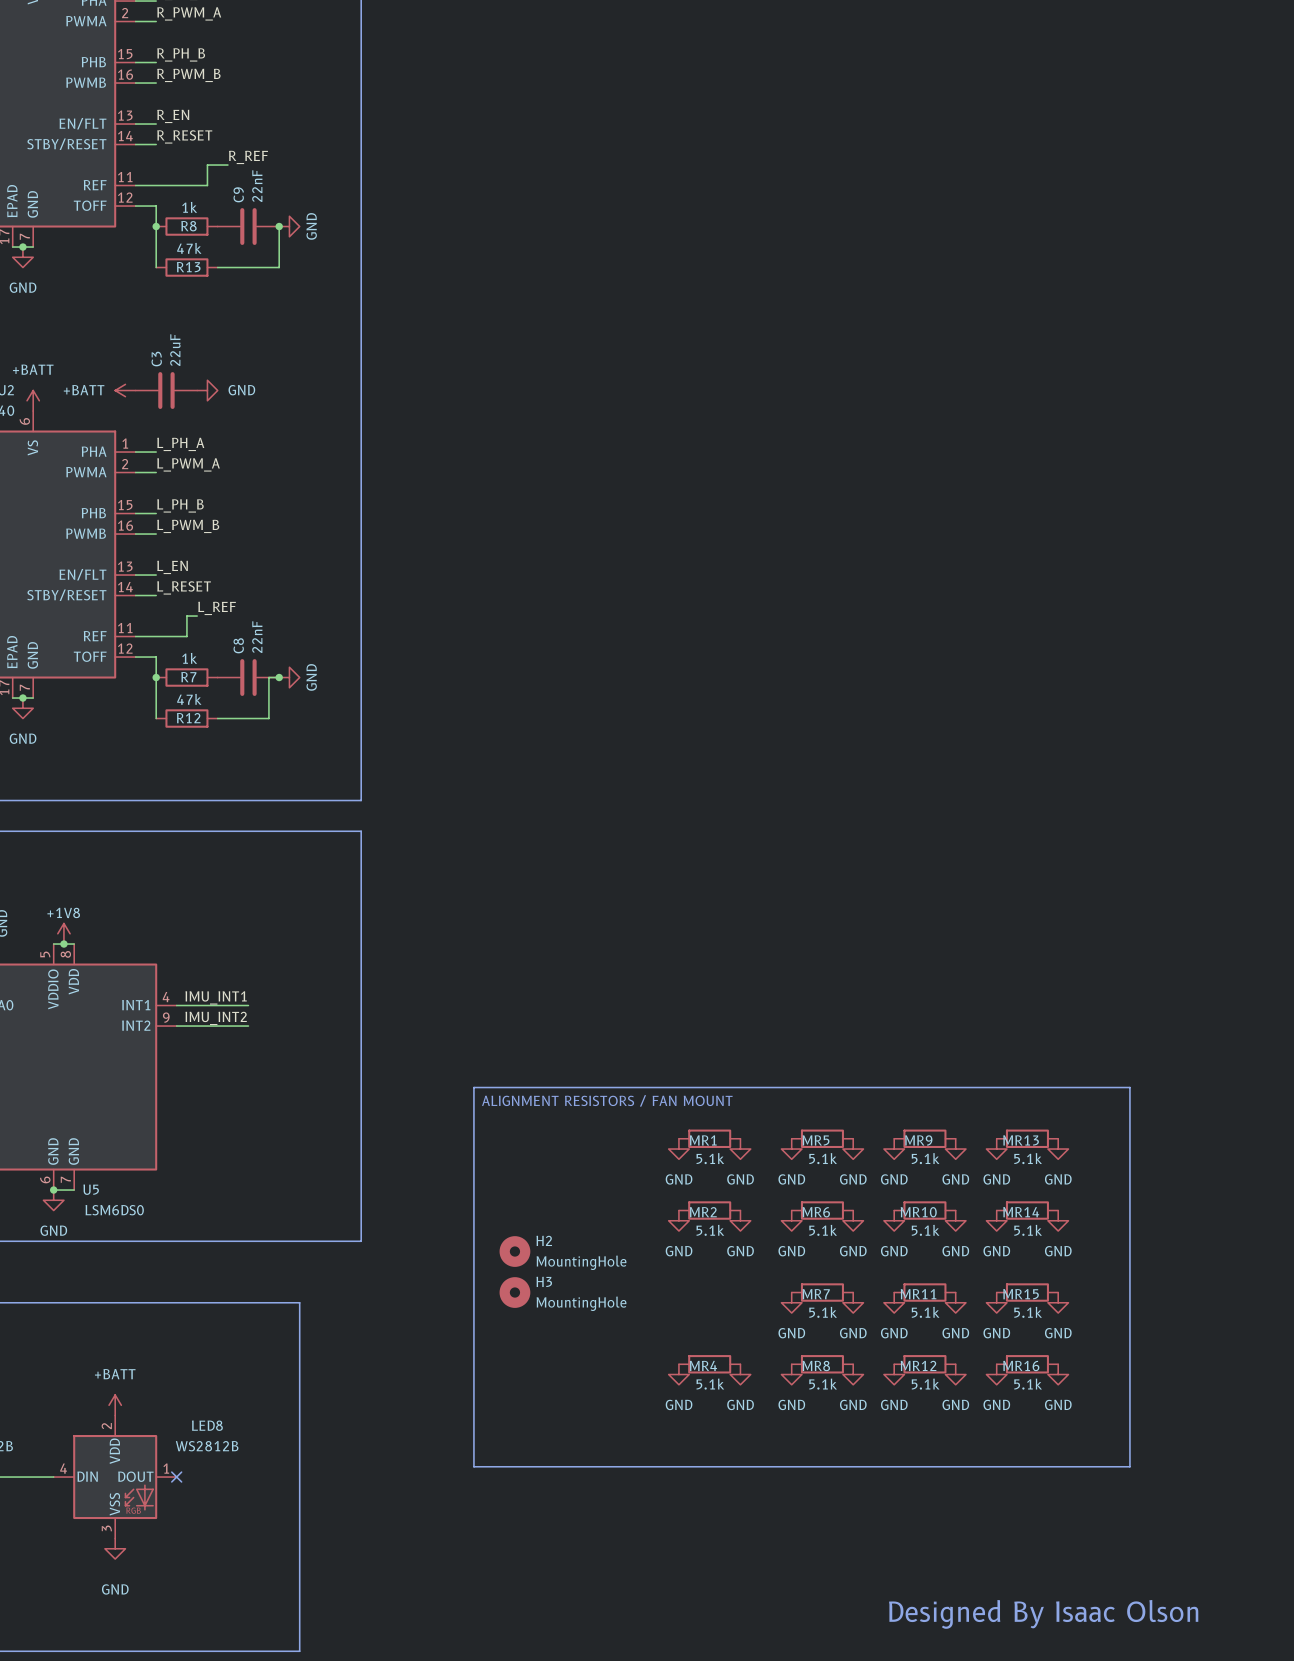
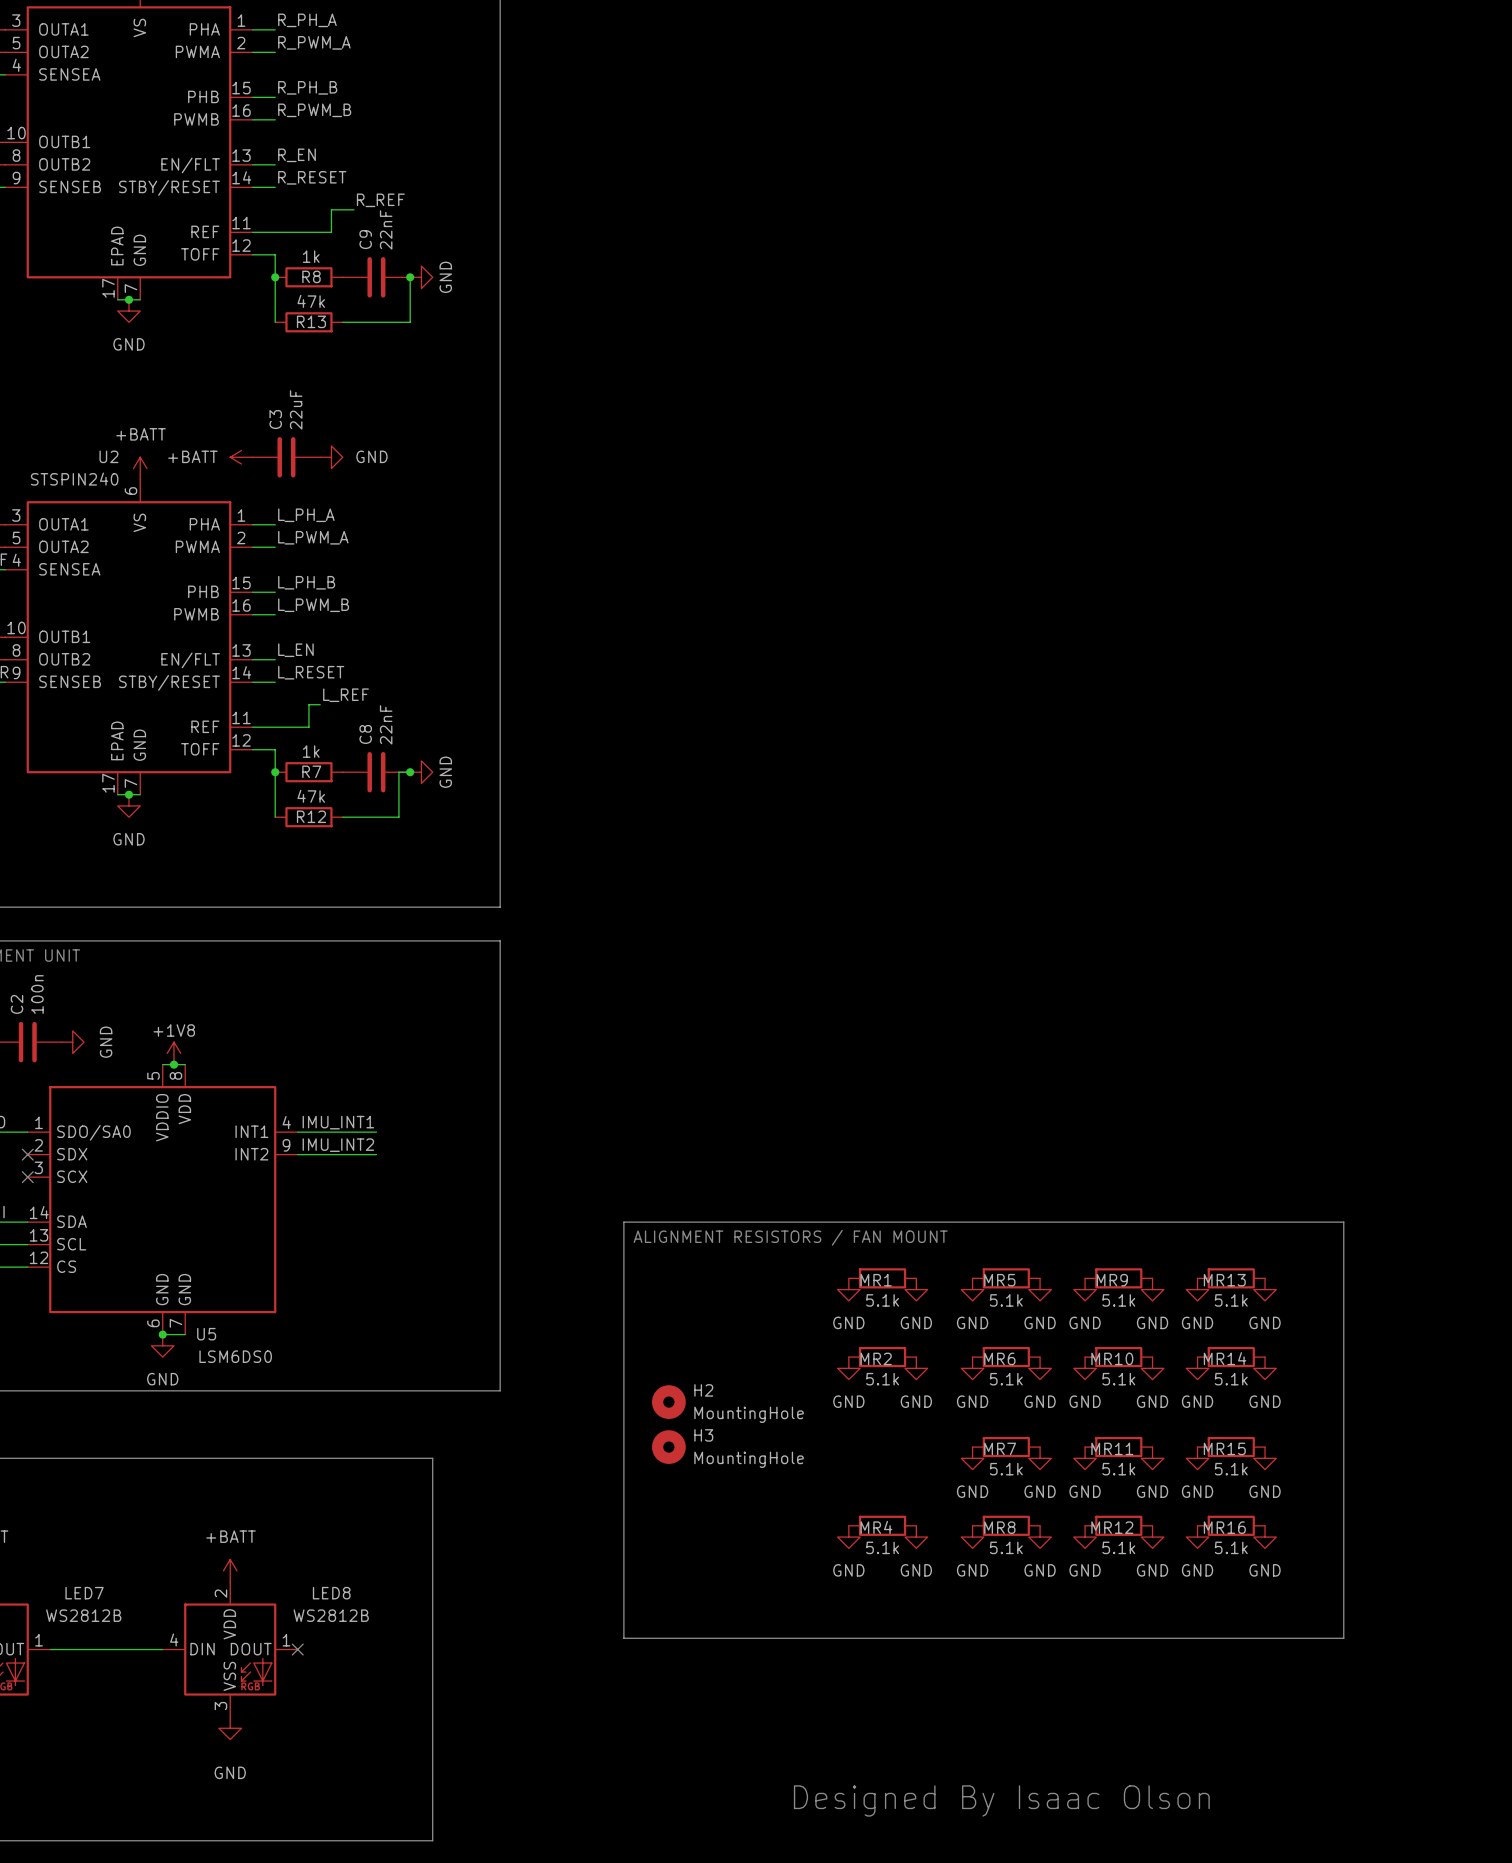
text: none -> Designed By Isaac Olson (1001, 1800)
text: Designed By Isaac Olson (1043, 1614) -> none

